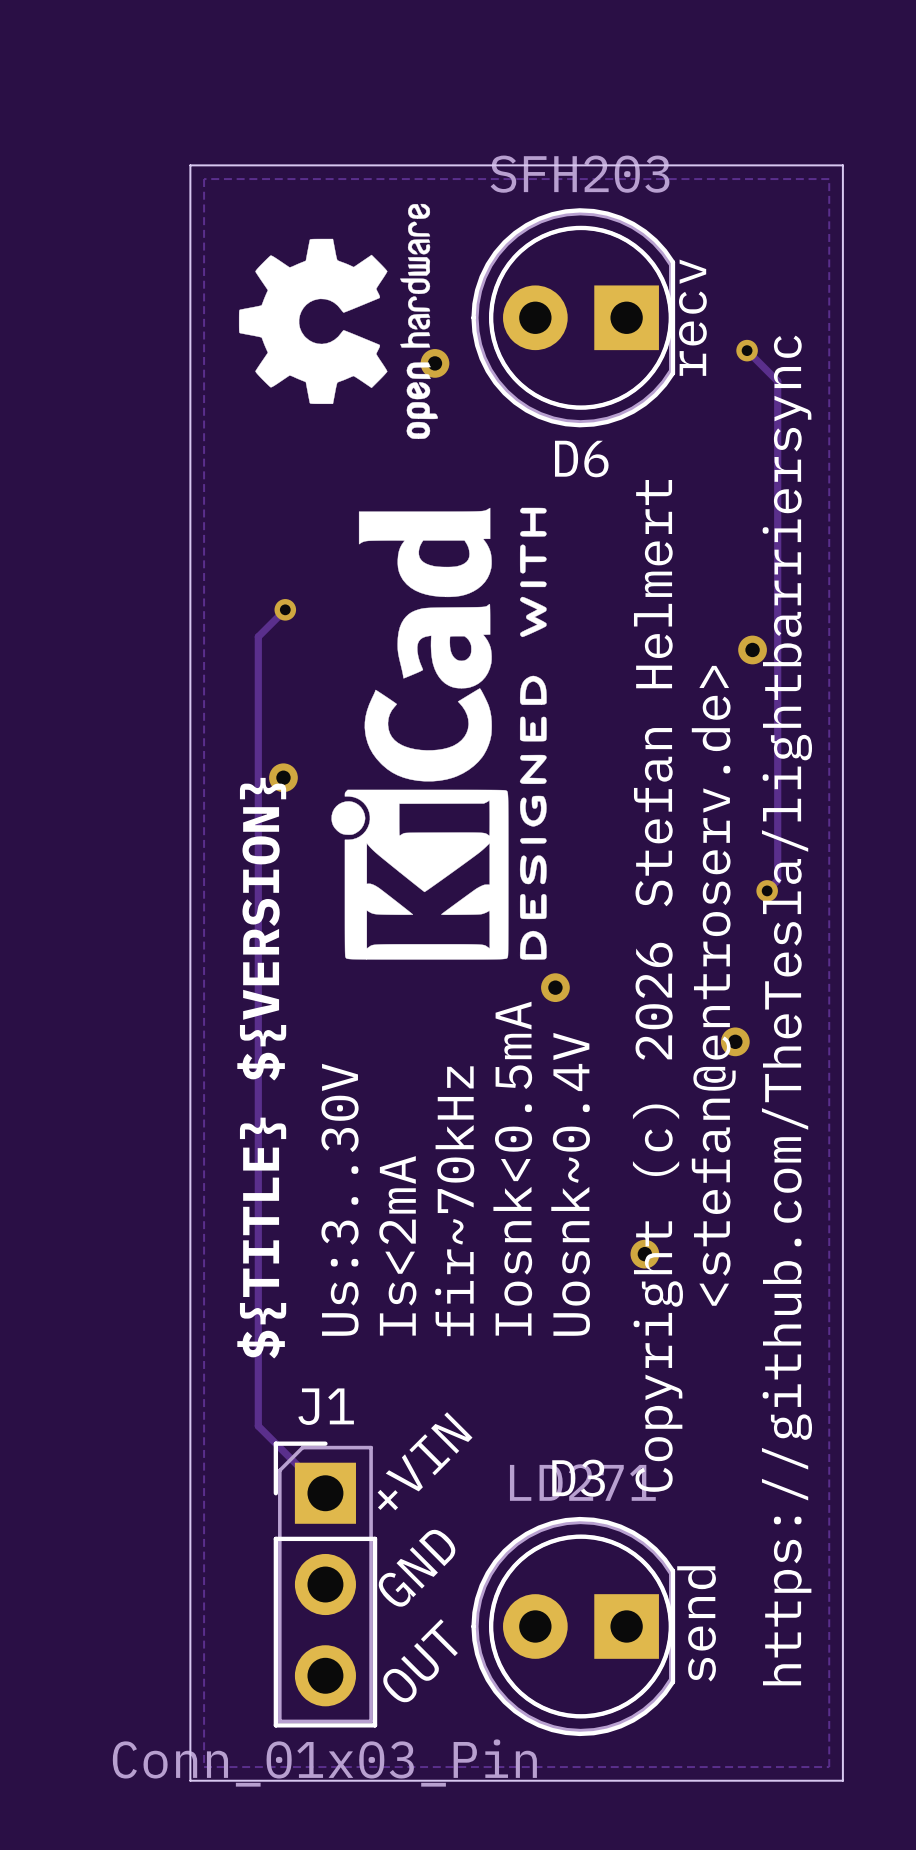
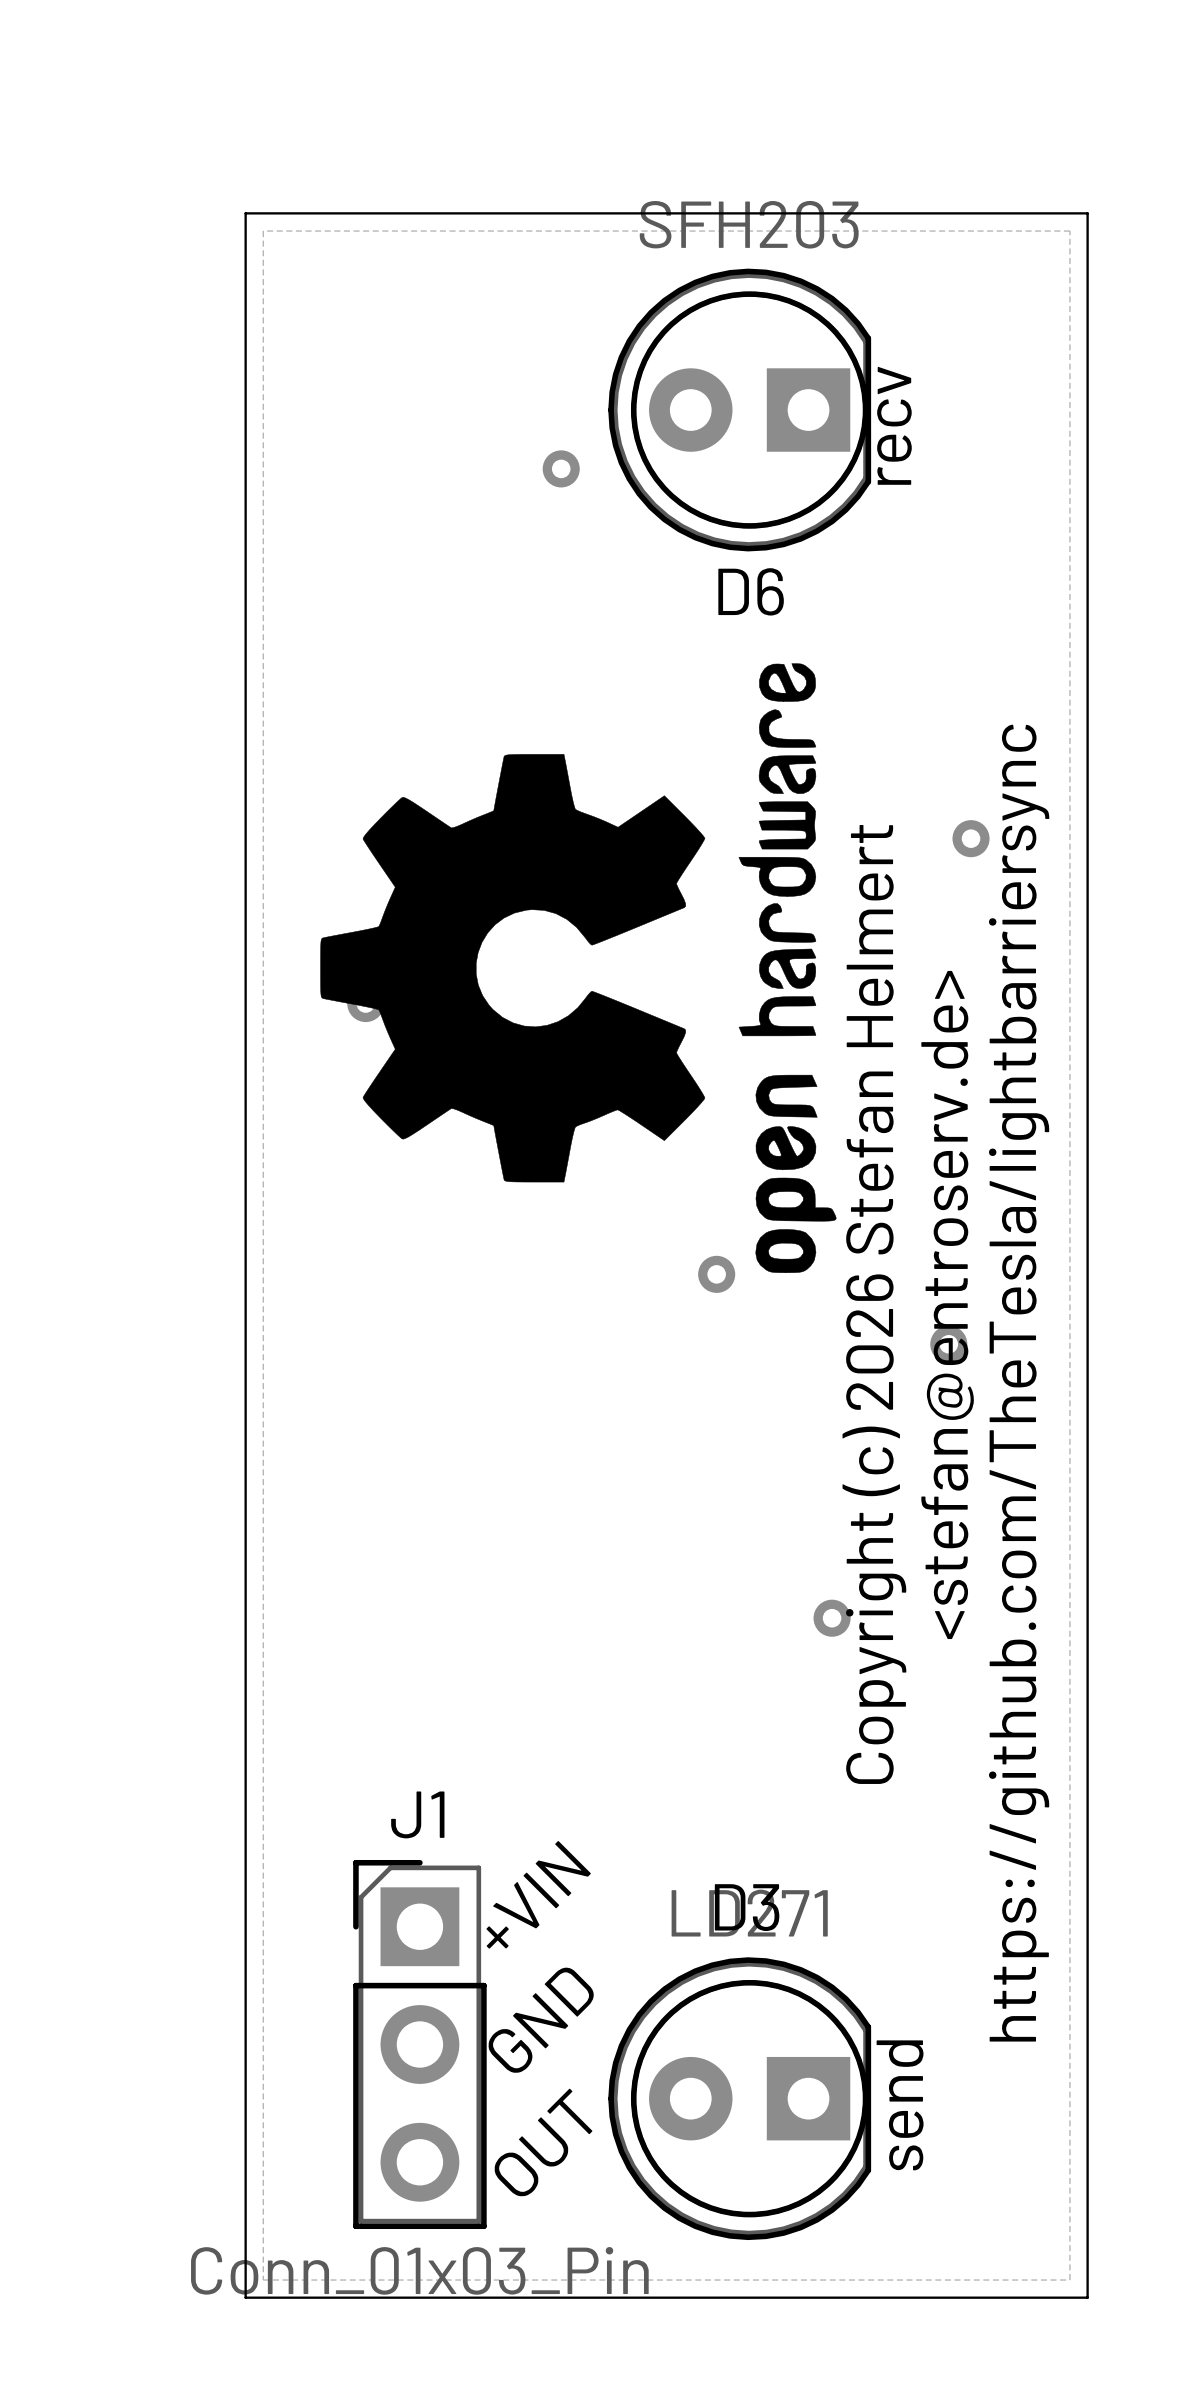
drawing: [238, 203, 438, 439] -> none
track: (747, 350) (777, 381) (777, 880) (767, 890) -> none
via: (747, 350) -> none
drawing shape: [331, 507, 547, 960] -> [320, 663, 837, 1273]
track: (285, 609) (258, 636) (258, 1426) (325, 1493) -> none
via: (285, 609) -> none
via: (767, 890) -> none
text position: Copyright (c) 2026 Stefan Helmert (657, 985) -> Copyright (c) 2026 Stefan Helmert (874, 1304)
text position: <stefan@entroserv.de> (713, 985) -> <stefan@entroserv.de> (947, 1304)
text position: https://github.com/TheTesla/lightbarriersync (786, 1010) -> https://github.com/TheTesla/lightbarriersync (1019, 1383)
text: ${TITLE} ${VERSION} (261, 1068) -> none
text: Iosnk<0.5mA (512, 1168) -> none
text: Uosnk~0.4V (570, 1184) -> none
text: Us:3..30V (340, 1199) -> none
text: fir~70kHz (454, 1201) -> none
text: Is<2mA (397, 1245) -> none

